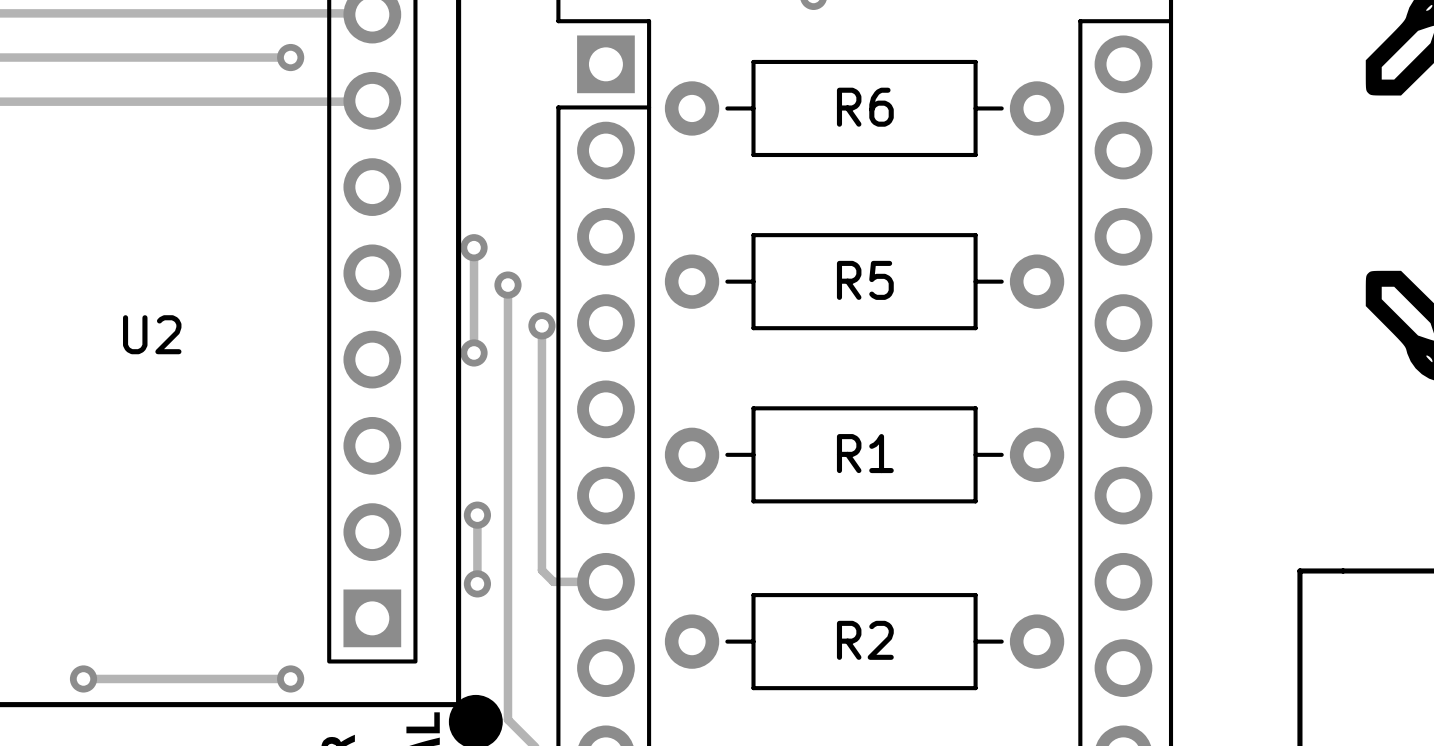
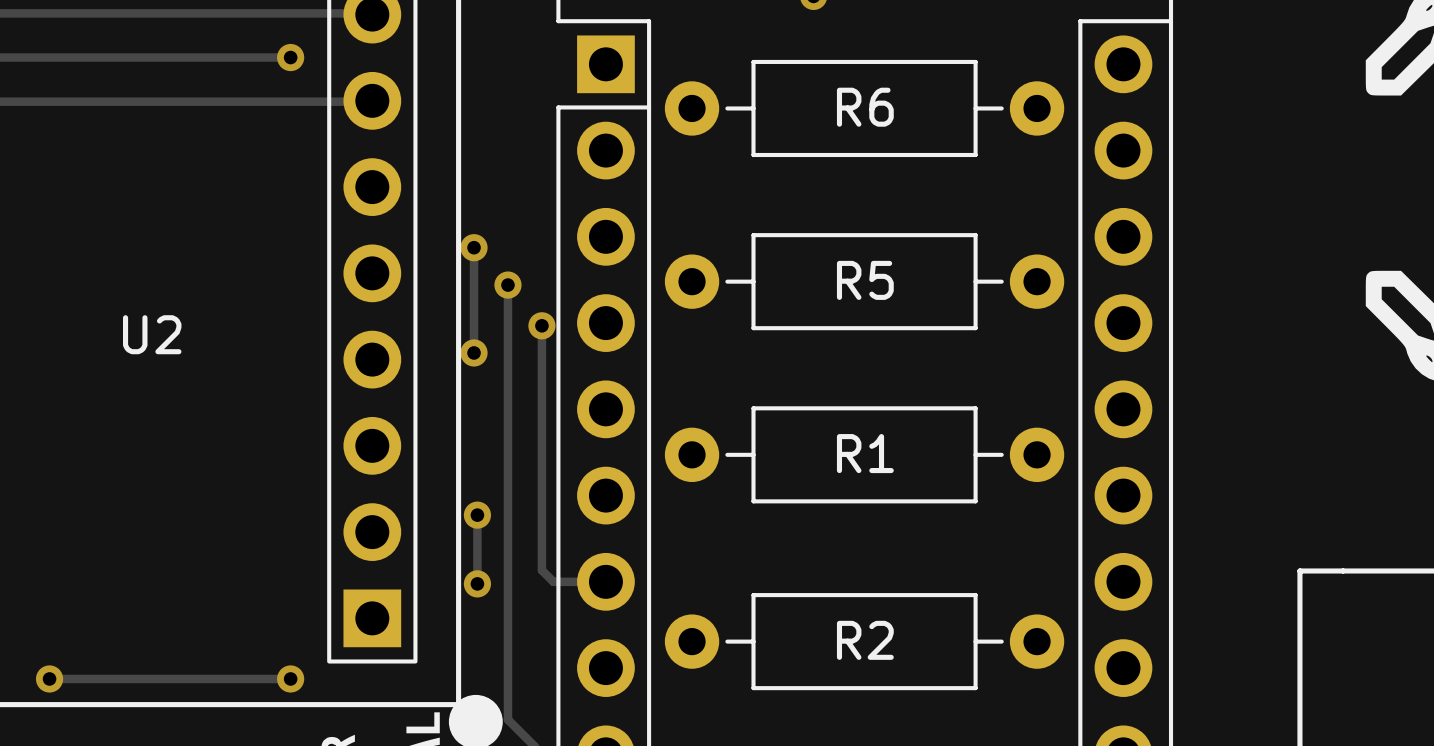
track: none -> (49, 678) (83, 678)
via position: (83, 678) -> (49, 678)

